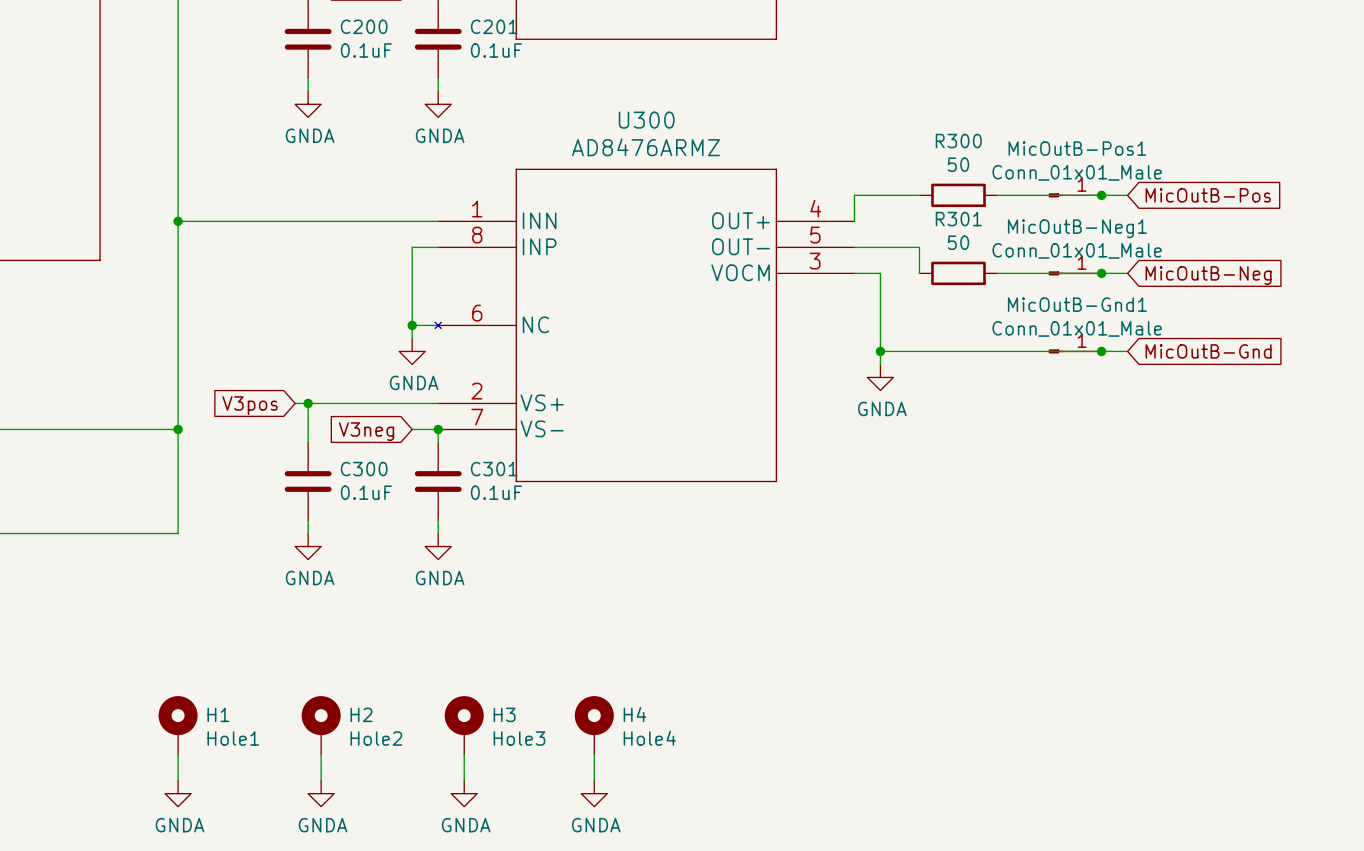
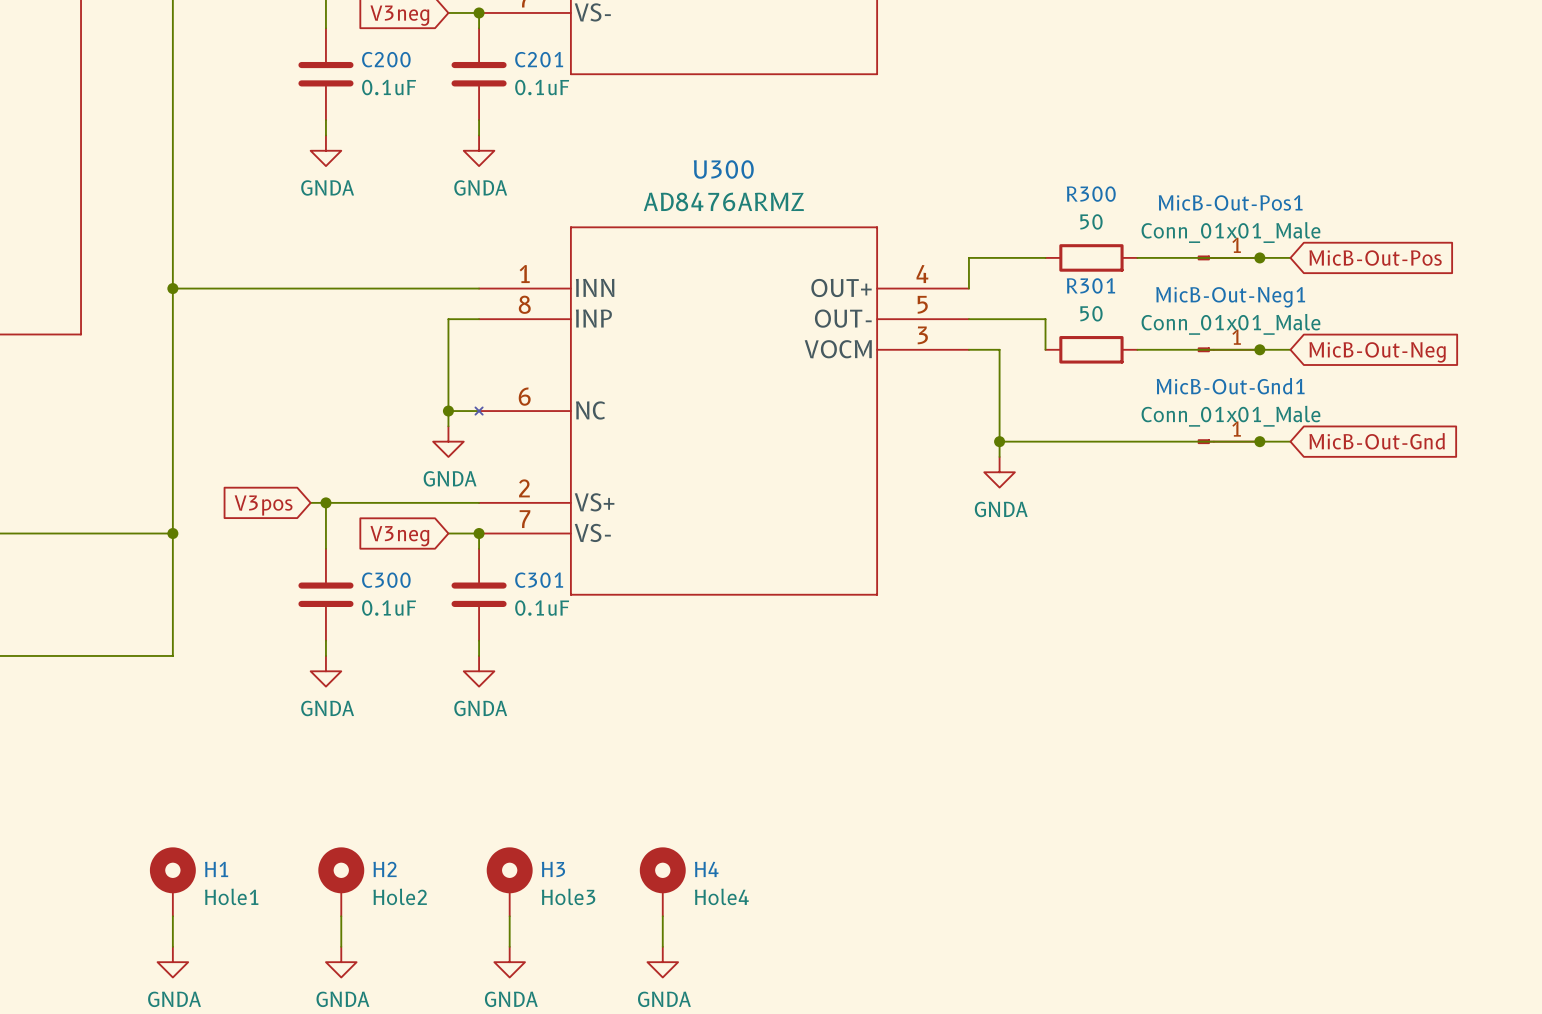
MicOutB-Pos1 name: MicOutB-Pos1 (1077, 148) -> MicB-Out-Pos1 (1230, 202)
global label: MicOutB-Pos (1208, 195) -> MicB-Out-Pos (1375, 258)
MicOutB-Neg1 name: MicOutB-Neg1 (1077, 228) -> MicB-Out-Neg1 (1230, 297)
global label: MicOutB-Neg (1208, 275) -> MicB-Out-Neg (1377, 352)
MicOutB-Gnd1 name: MicOutB-Gnd1 (1077, 304) -> MicB-Out-Gnd1 (1230, 386)
global label: MicOutB-Gnd (1208, 351) -> MicB-Out-Gnd (1377, 441)

